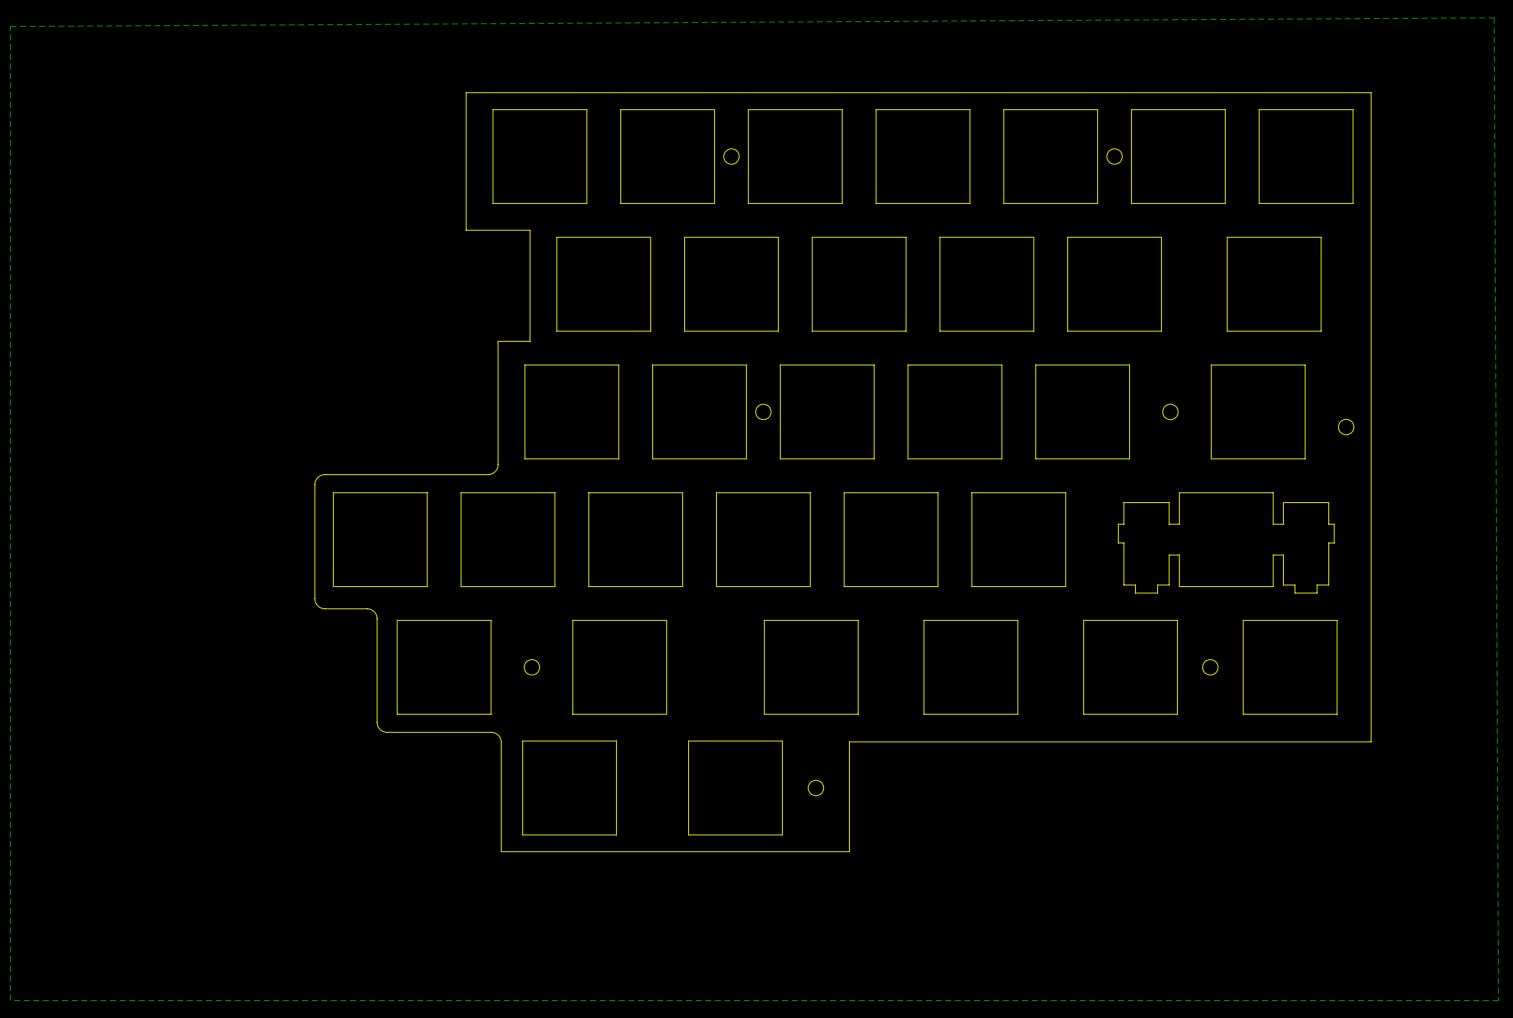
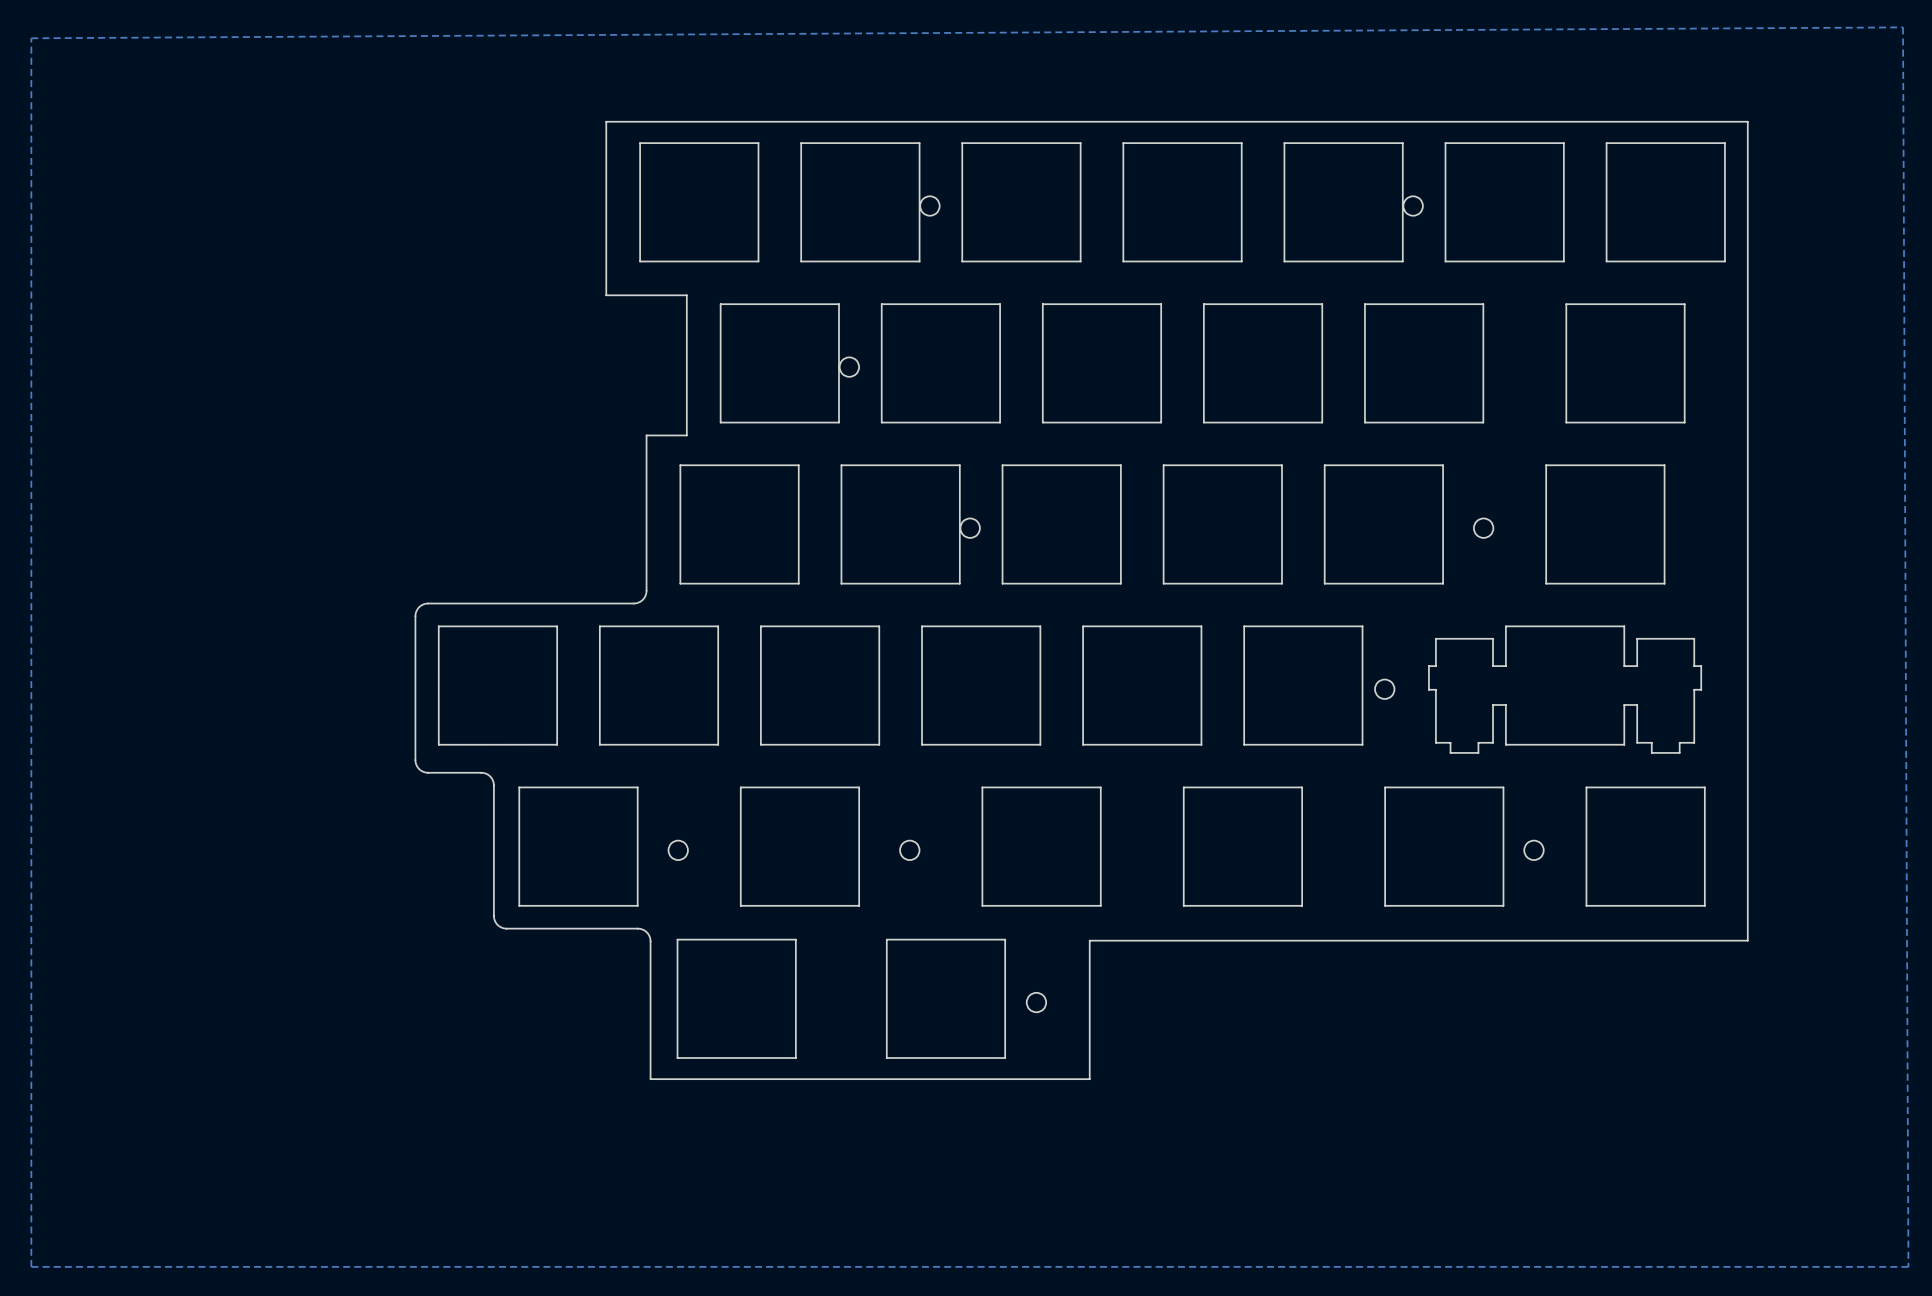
round board edge: [723, 148, 740, 165] -> none
round board edge: [1106, 148, 1123, 165] -> none
round board edge: none -> [920, 196, 940, 216]
round board edge: none -> [1403, 196, 1423, 216]
round board edge: none -> [839, 357, 860, 377]
round board edge: [755, 403, 772, 420] -> none
round board edge: [1162, 403, 1179, 420] -> none
round board edge: none -> [960, 518, 980, 538]
round board edge: none -> [1473, 518, 1494, 538]
round board edge: [1338, 419, 1355, 436] -> none
round board edge: none -> [1375, 679, 1395, 699]
round board edge: [523, 659, 540, 676] -> none
round board edge: [1202, 659, 1219, 676] -> none
round board edge: none -> [668, 840, 688, 861]
round board edge: none -> [900, 840, 920, 861]
round board edge: none -> [1524, 840, 1544, 861]
round board edge: [807, 779, 824, 797] -> none
round board edge: none -> [1026, 992, 1047, 1013]

